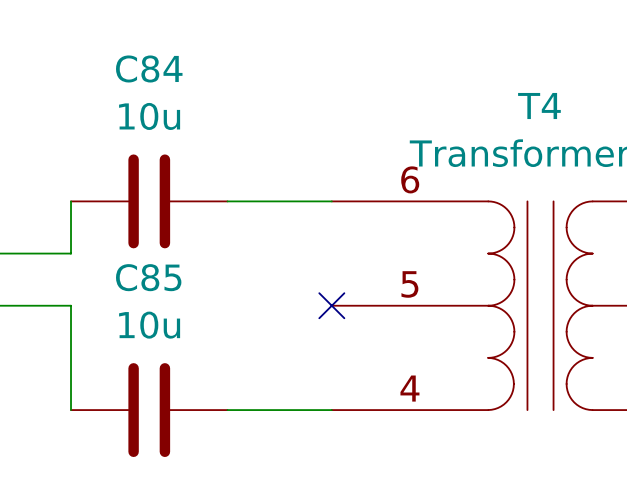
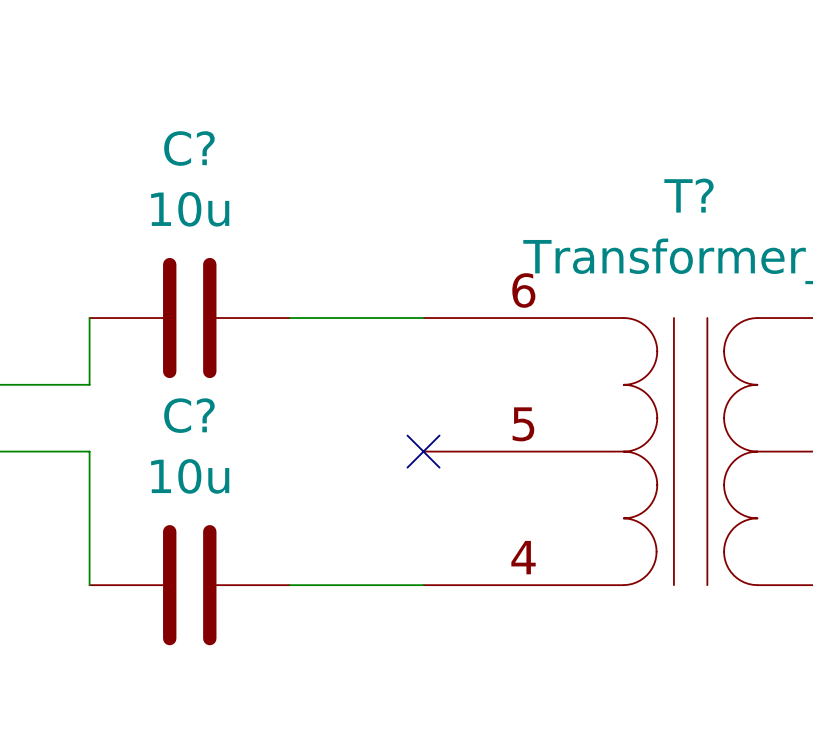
C84 name: C84 (149, 68) -> C? (189, 148)
T4 name: T4 (539, 106) -> T? (688, 195)
C85 name: C85 (148, 277) -> C? (189, 415)

